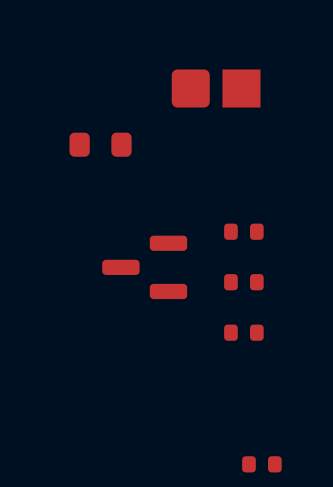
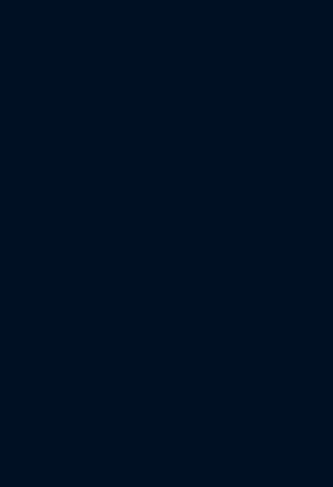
part: (216, 88) -> none
part: (100, 144) -> none
part: (243, 231) -> none
part: (144, 267) -> none
part: (243, 282) -> none
part: (243, 332) -> none
part: (261, 464) -> none

